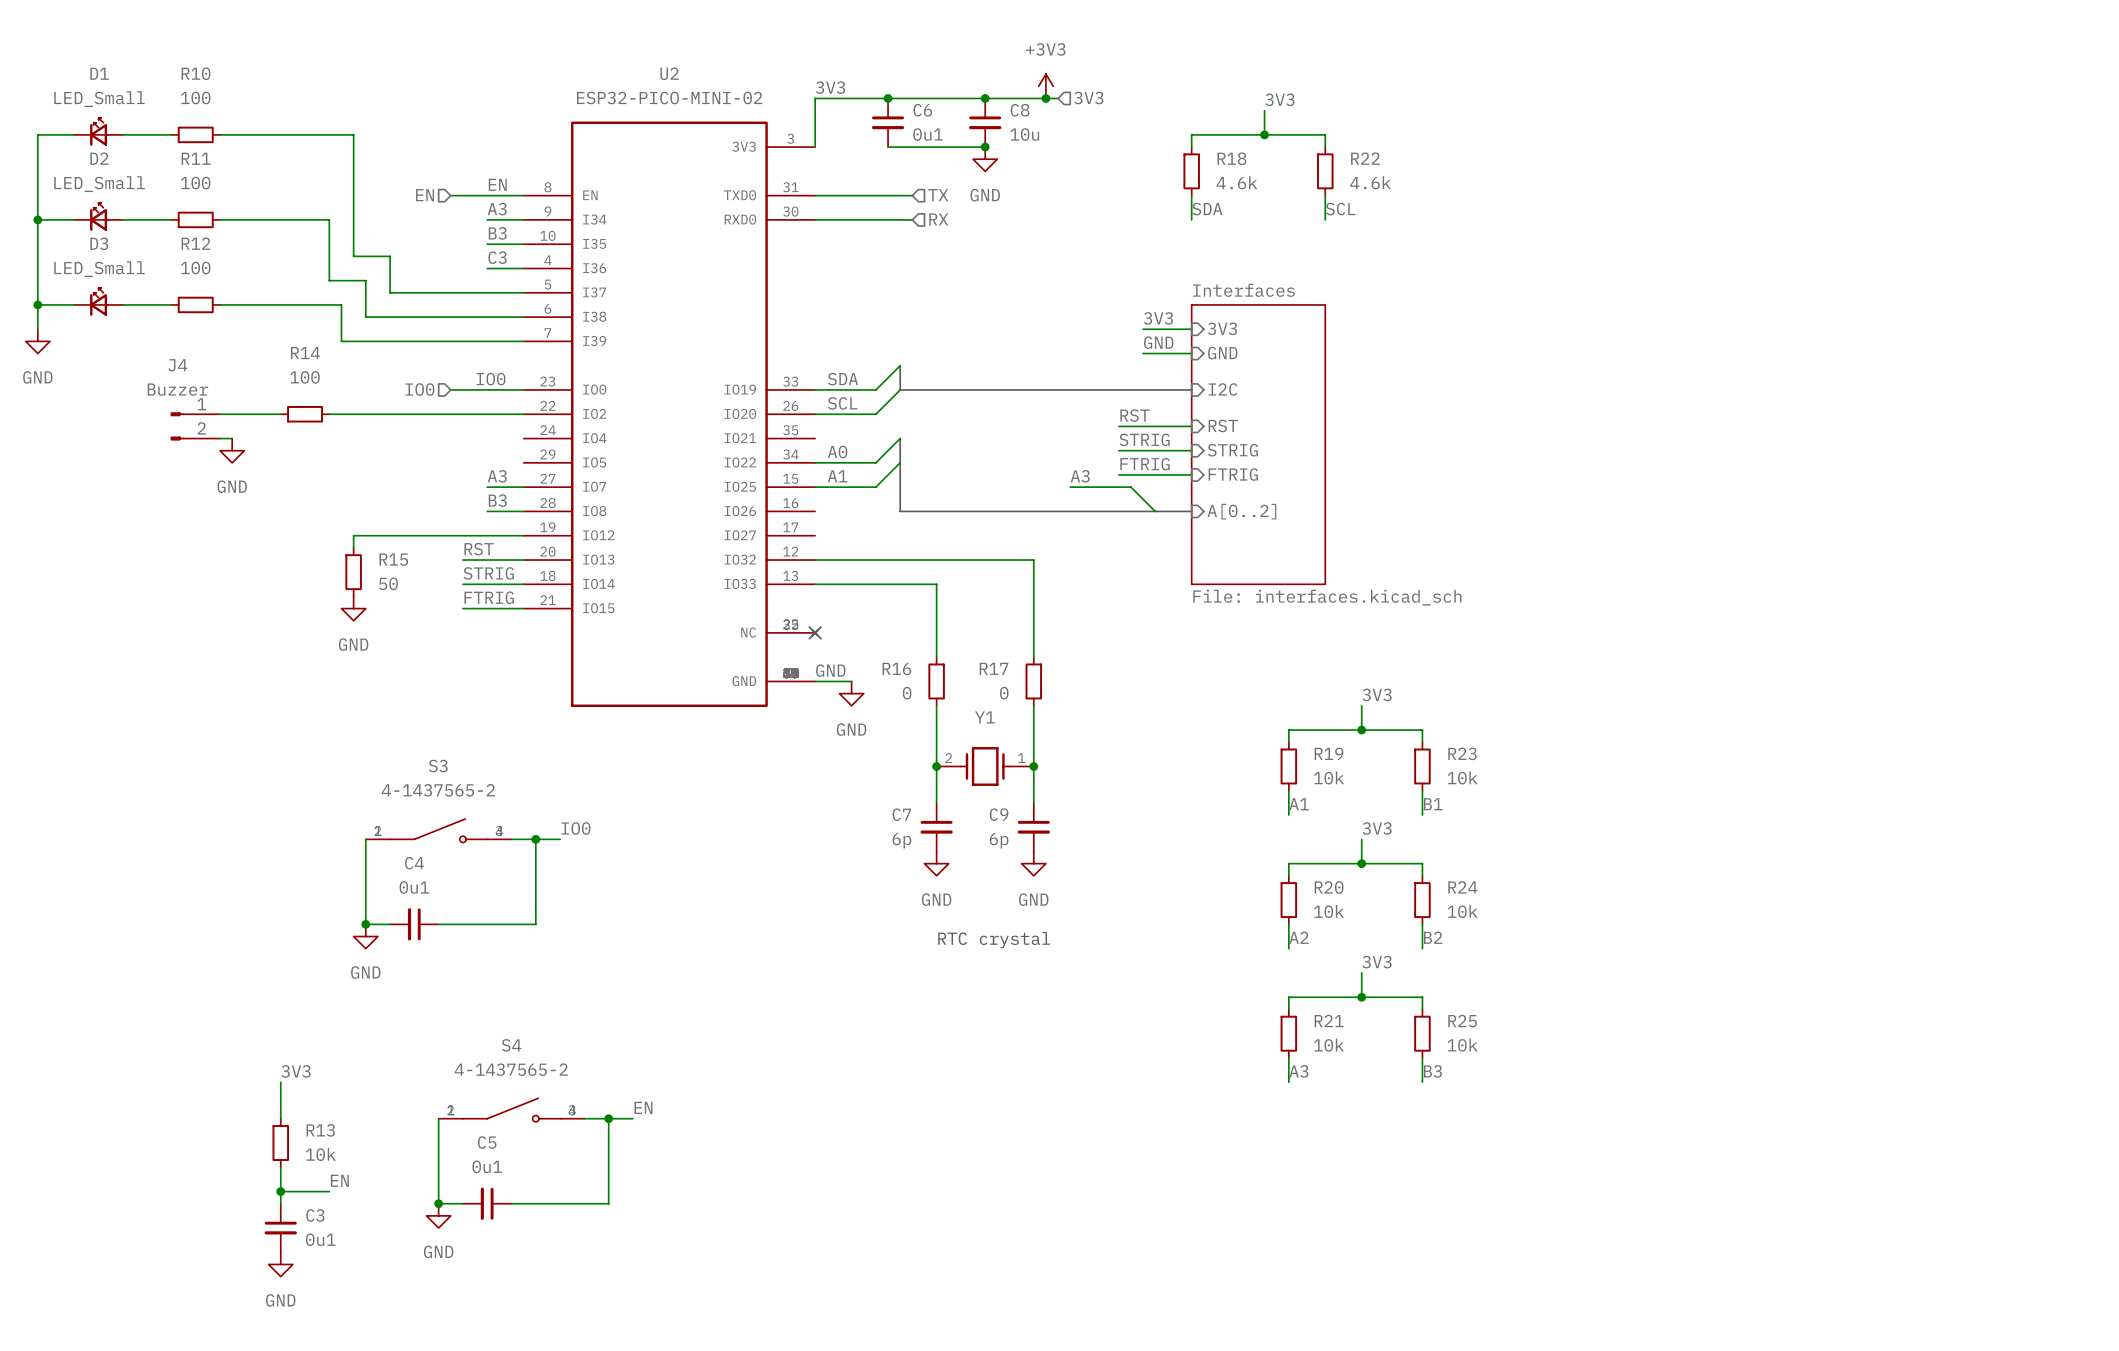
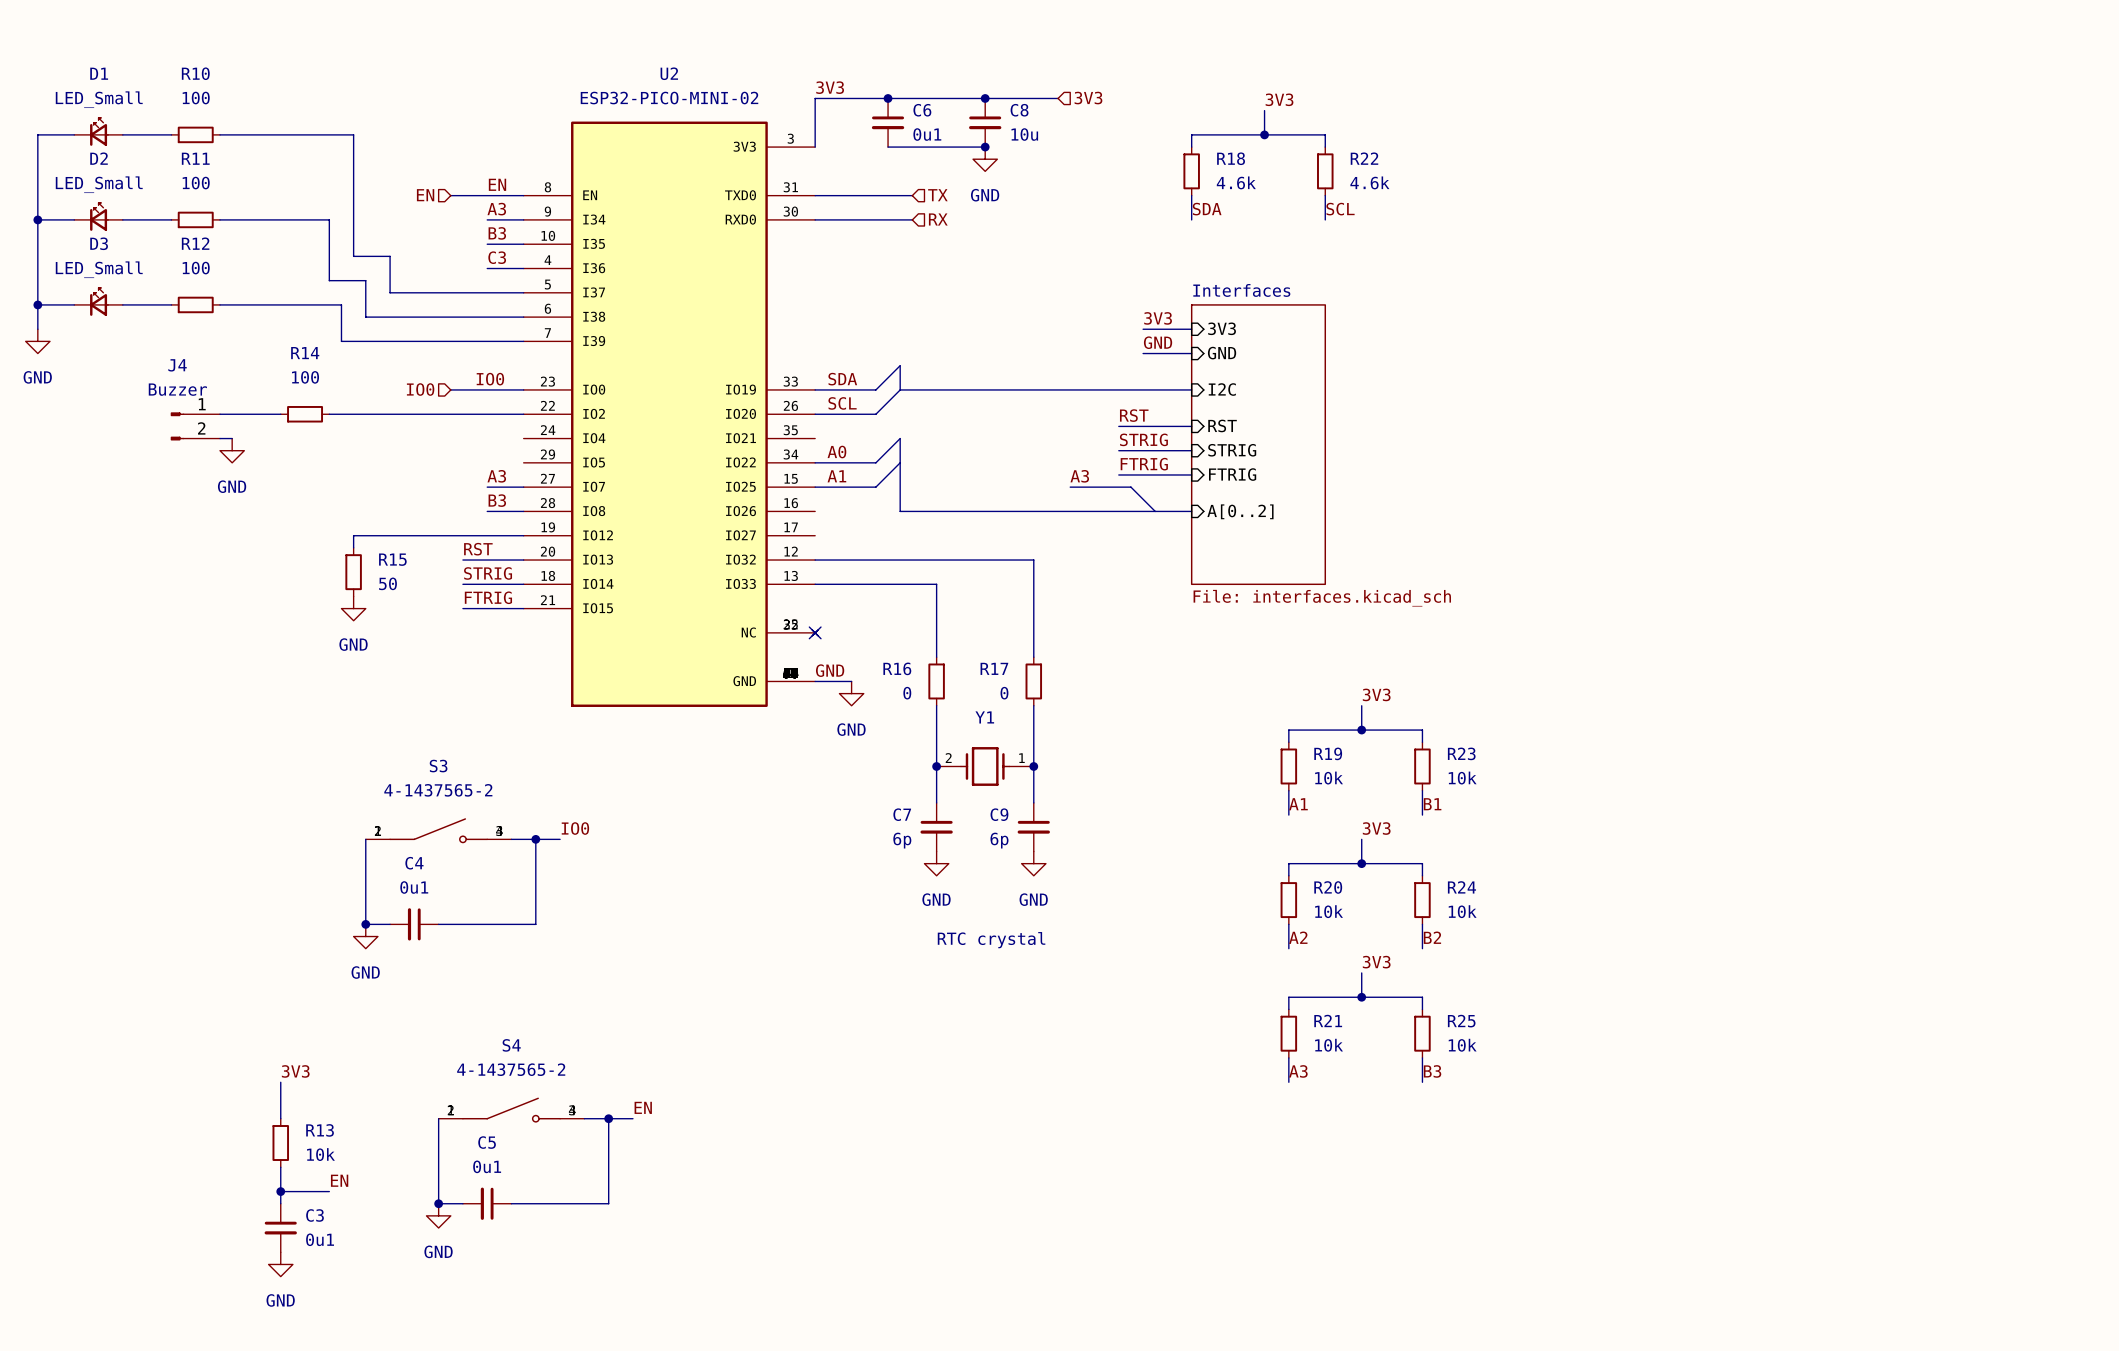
power symbol: +3V3 (1045, 86) -> none
junction: (1045, 98) -> none

